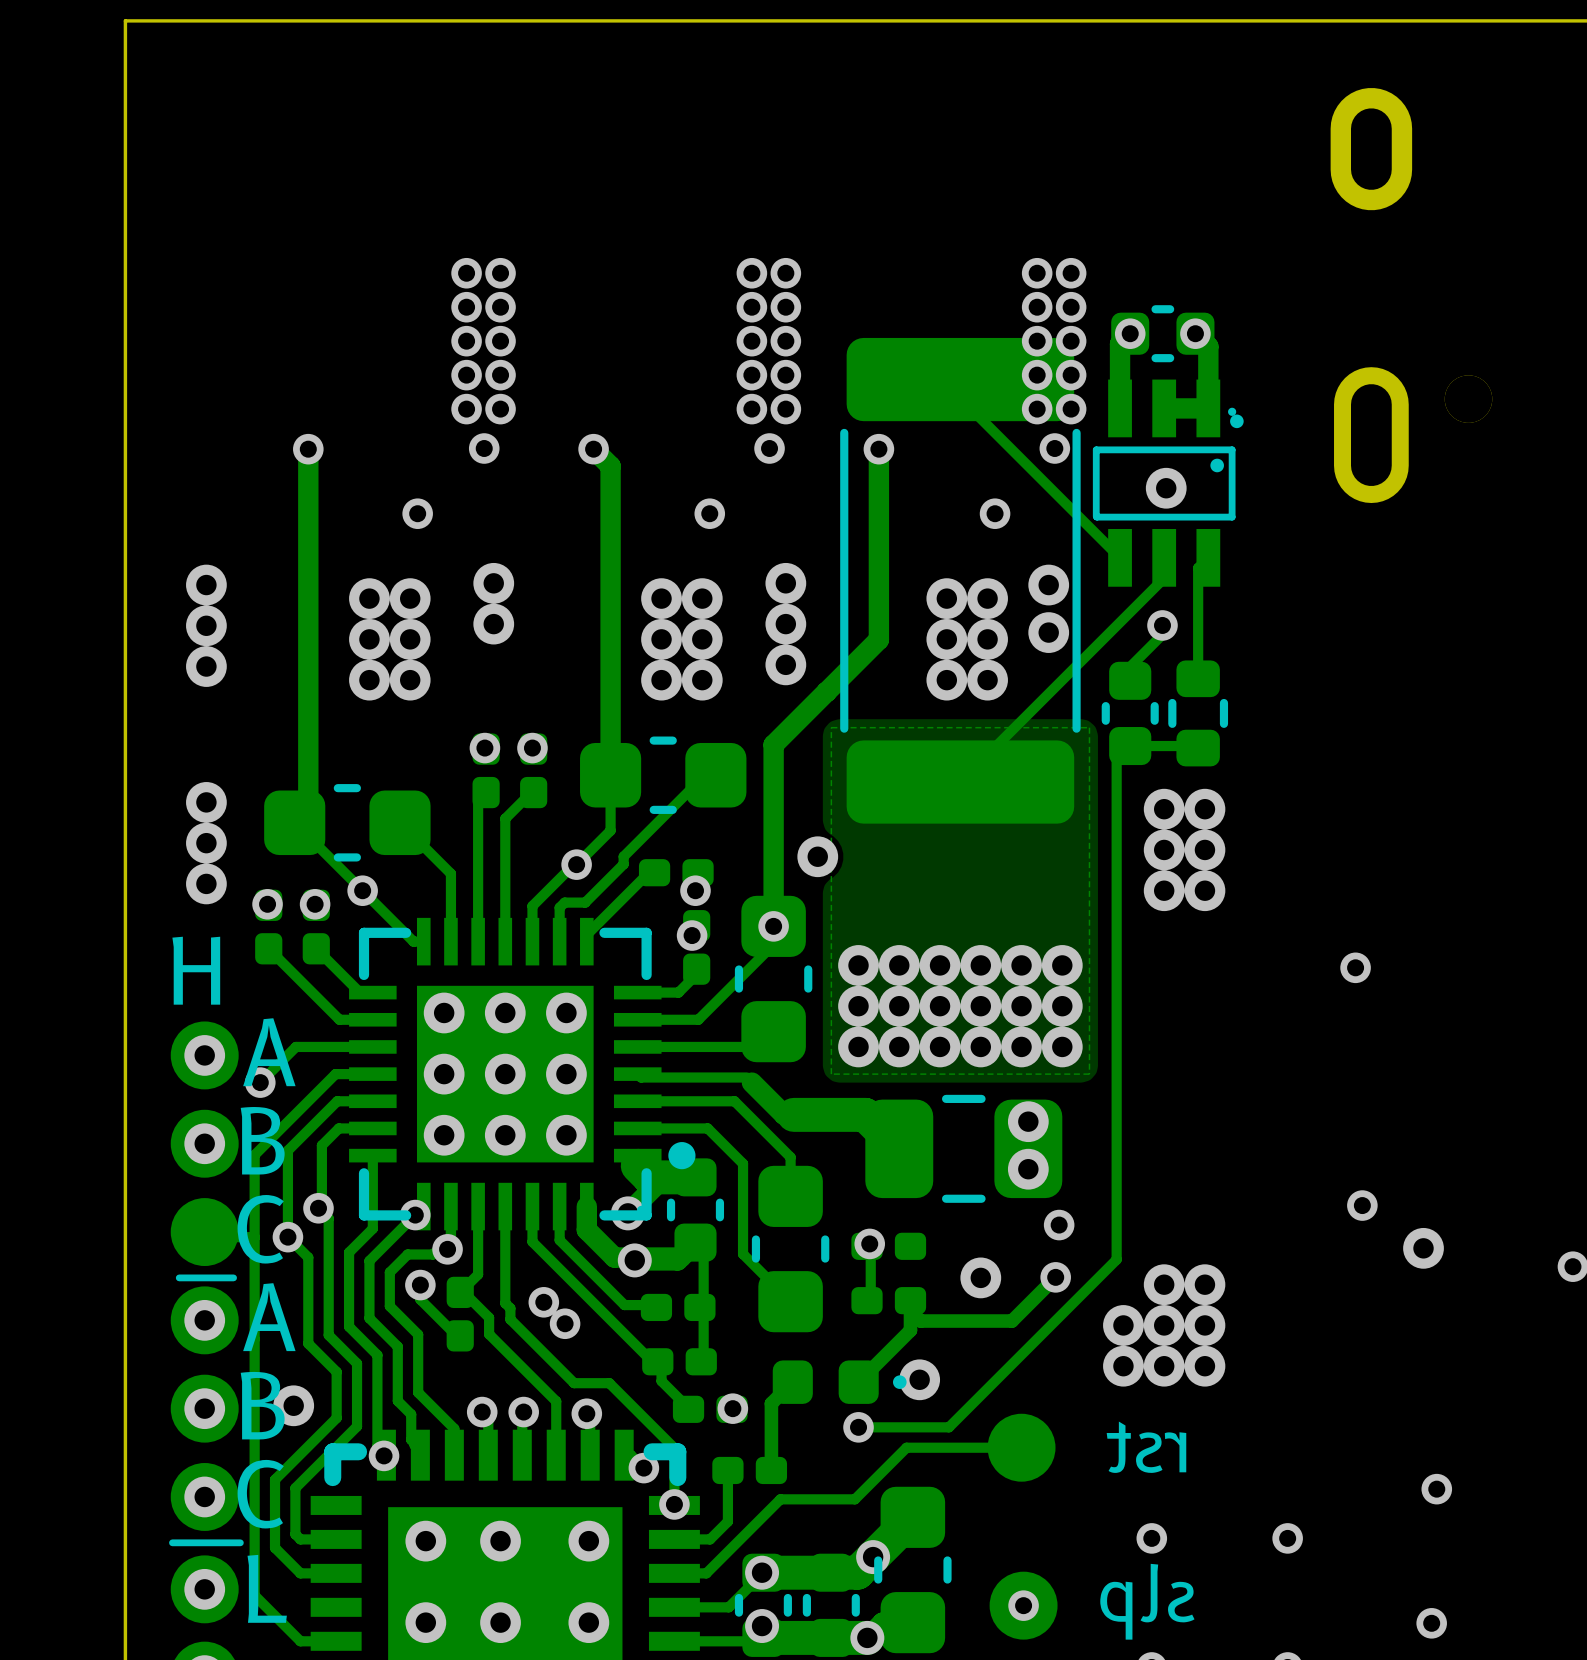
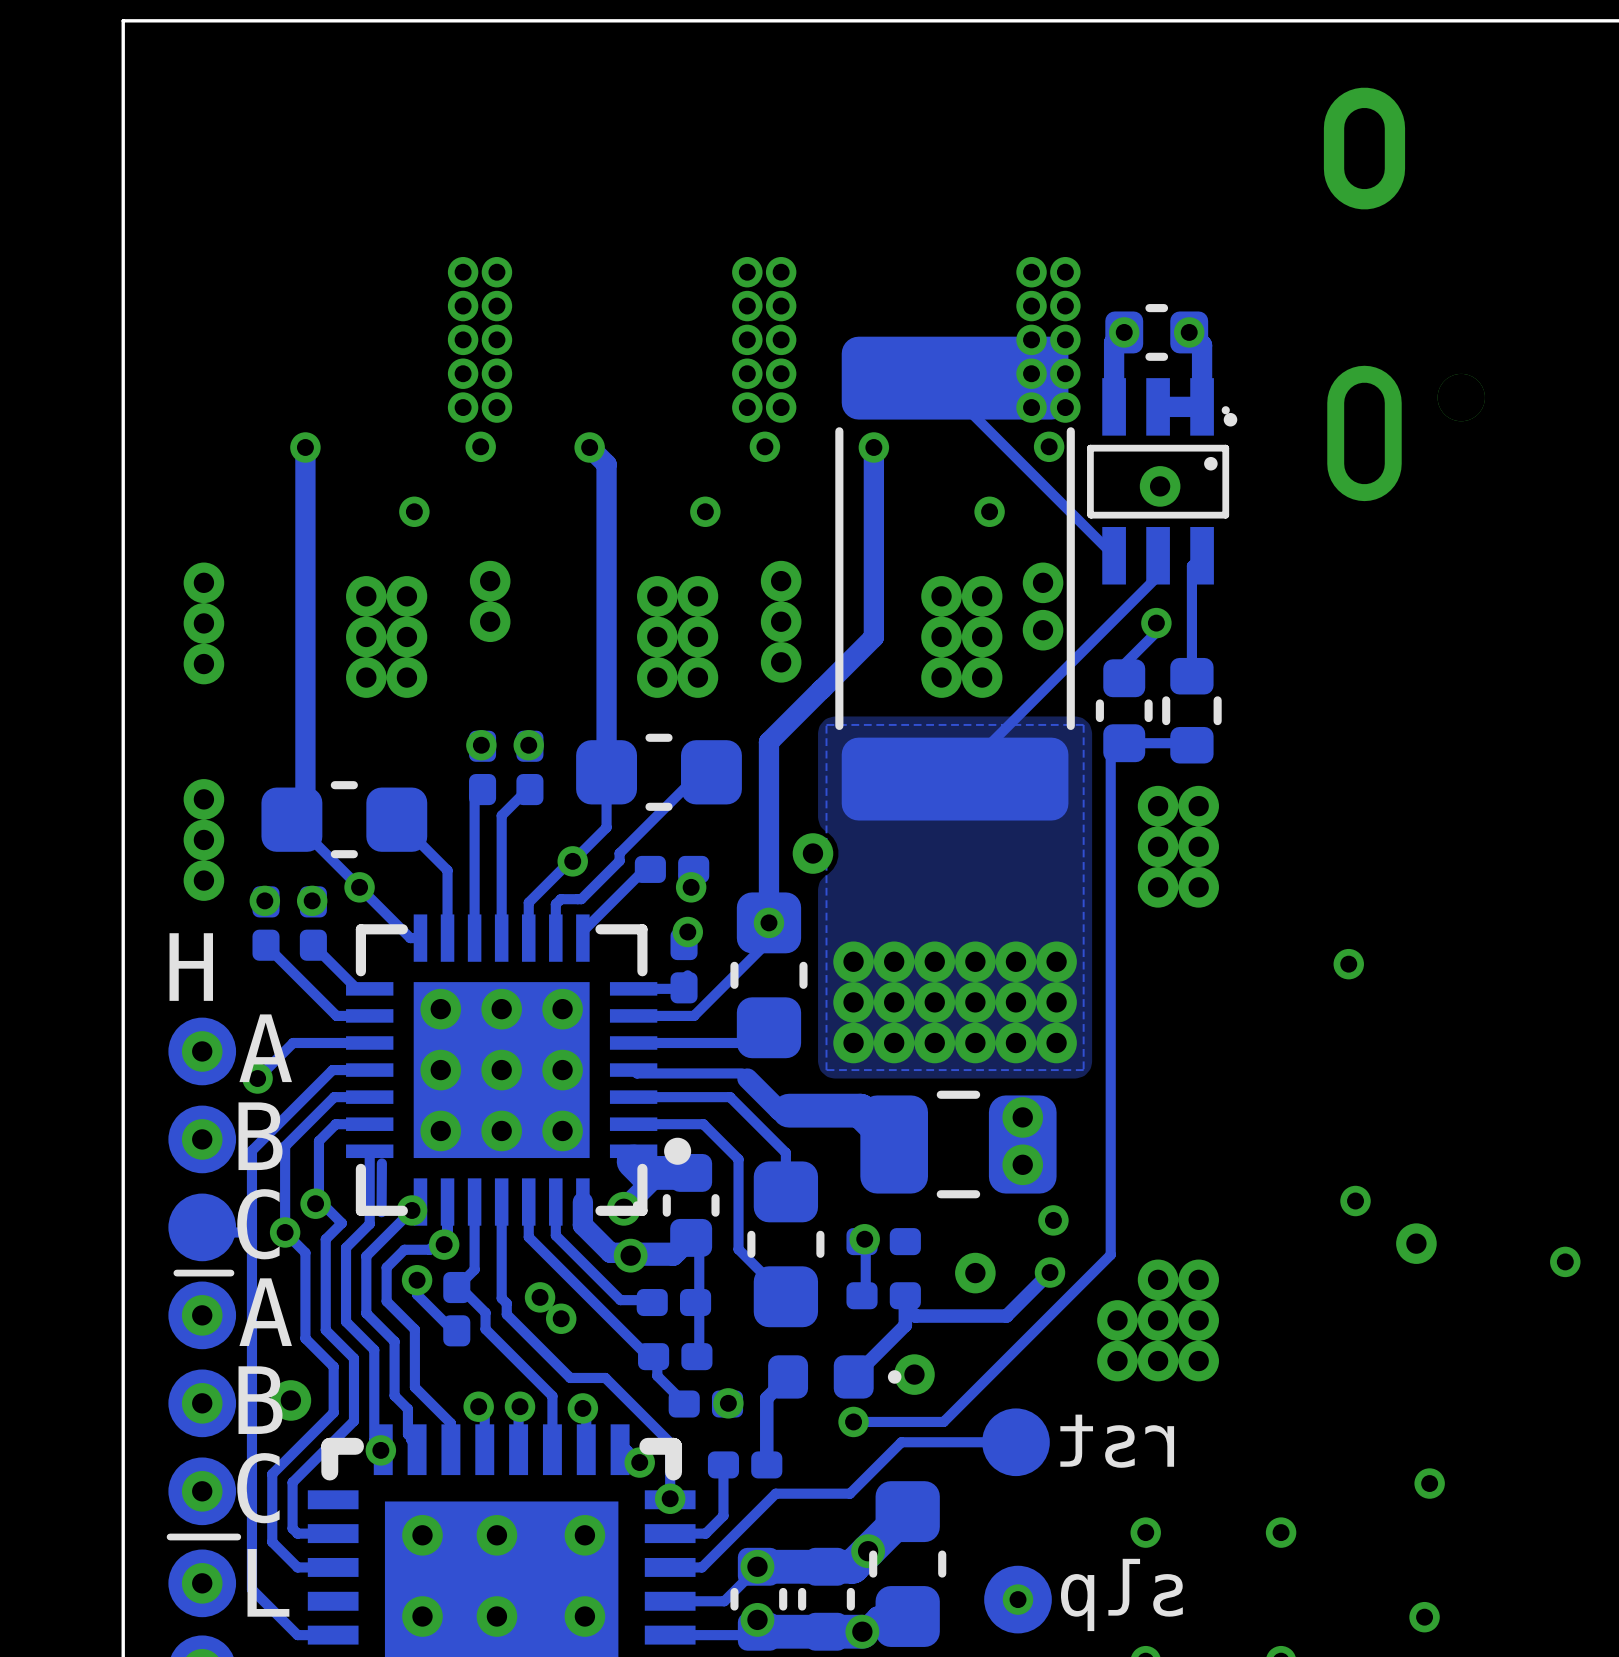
part position: (696, 947) -> (684, 966)
track: none -> (381, 1163) (381, 1212)
track: (318, 1208) (328, 1218) (328, 1244) -> (315, 1203) (322, 1203) (341, 1223) (325, 1239)

